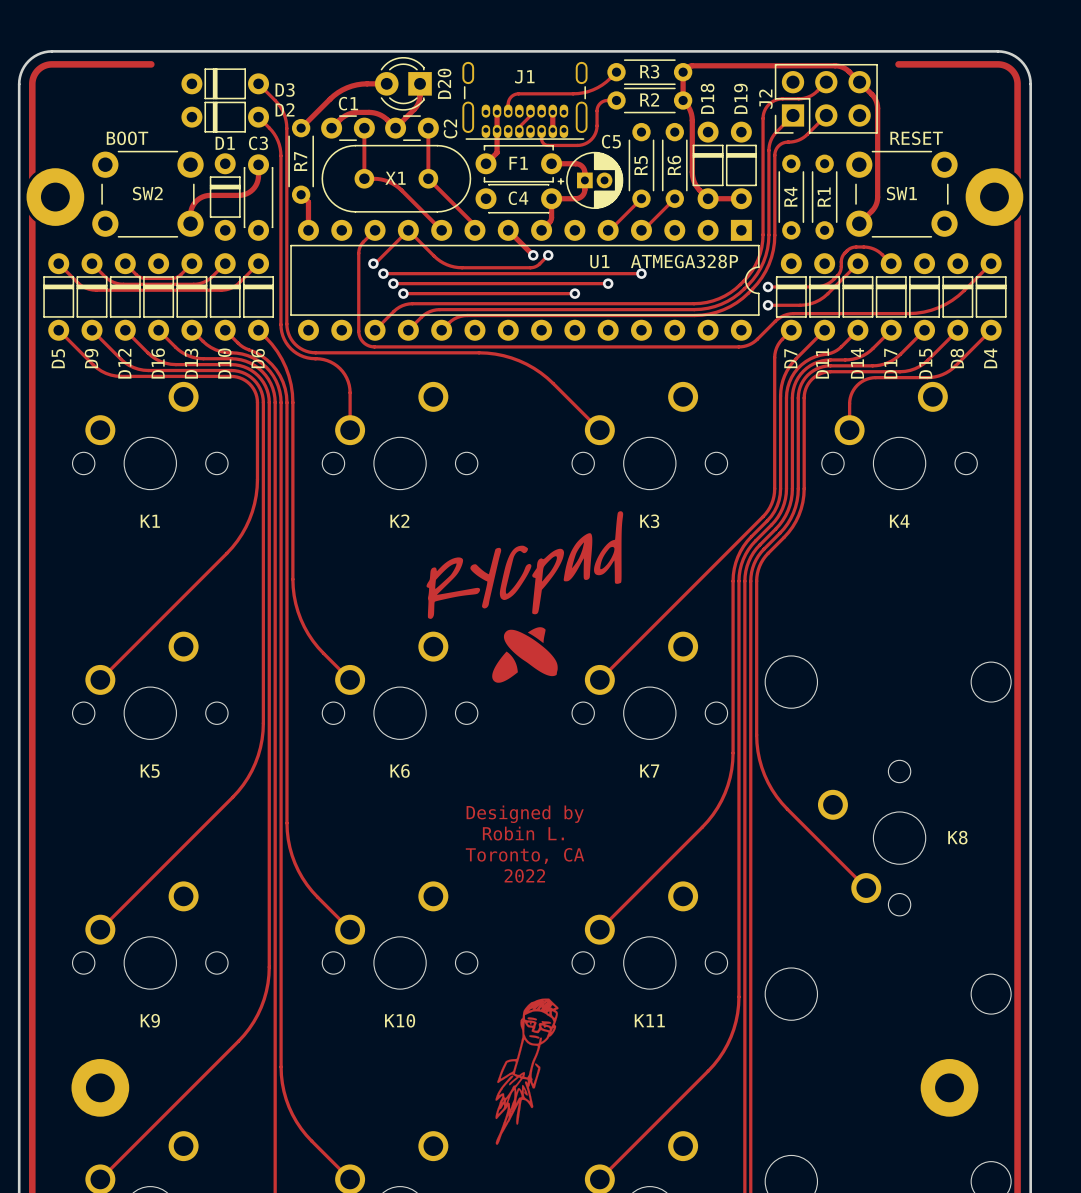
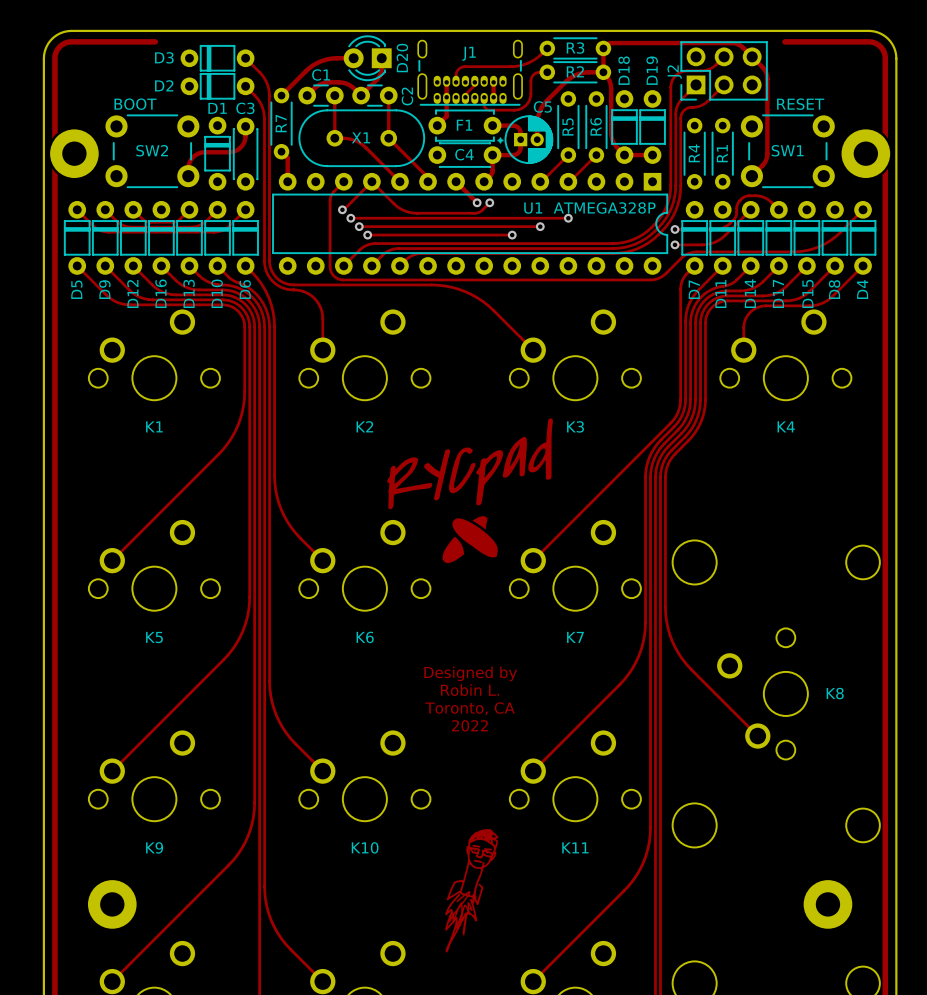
D3 name position: D3 (285, 90) -> D3 (164, 57)
track: none -> (603, 72) (585, 72) (573, 76) (546, 100) (538, 115) (537, 139)
D2 name position: D2 (285, 109) -> D2 (164, 85)

